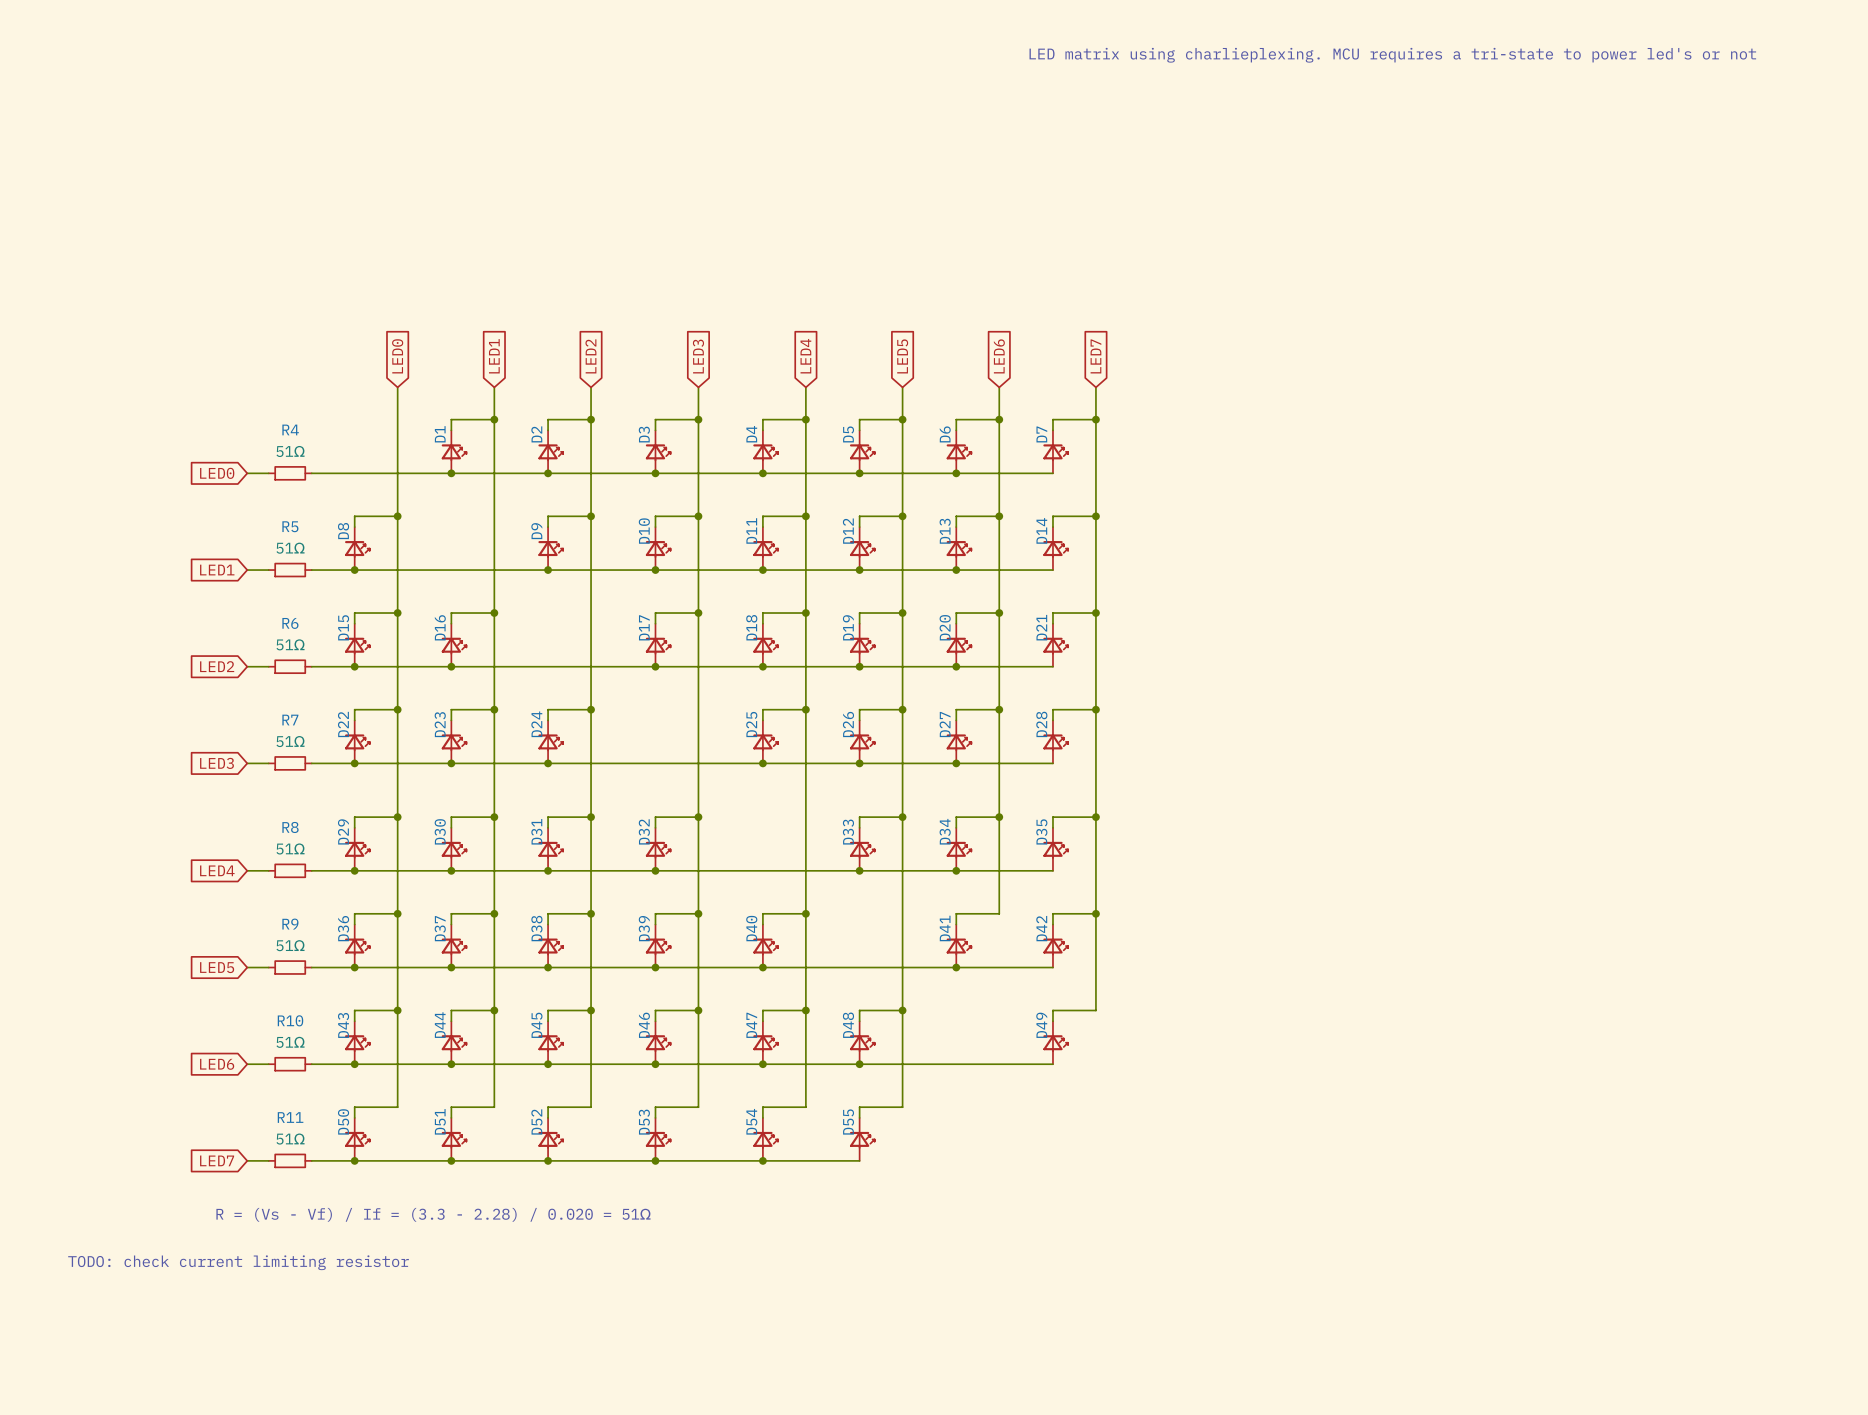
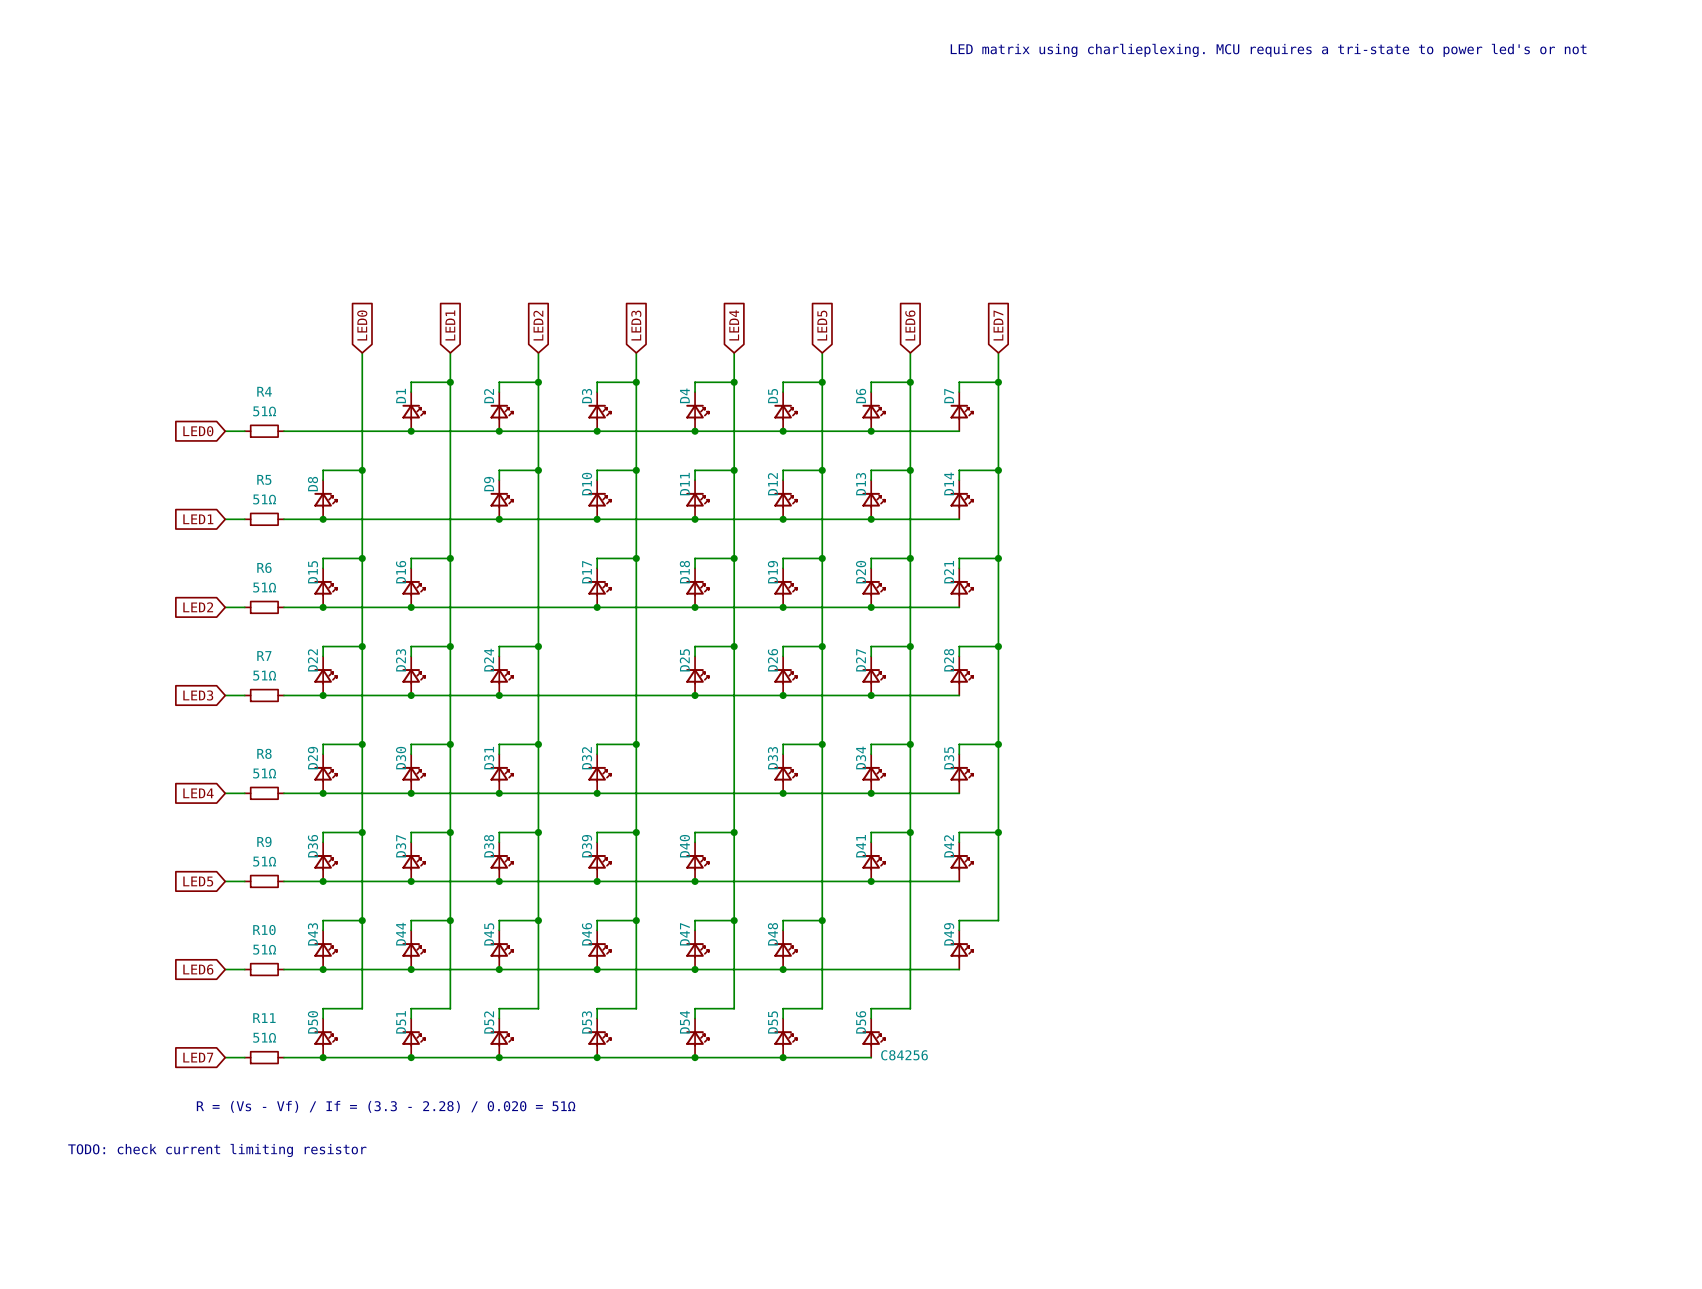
wire: none -> (910, 832) (910, 1008) (871, 1008) (871, 1018)
junction: none -> (910, 832)
D56: none -> (873, 1038)
wire: none -> (783, 1057) (871, 1057)
junction: none -> (783, 1057)

